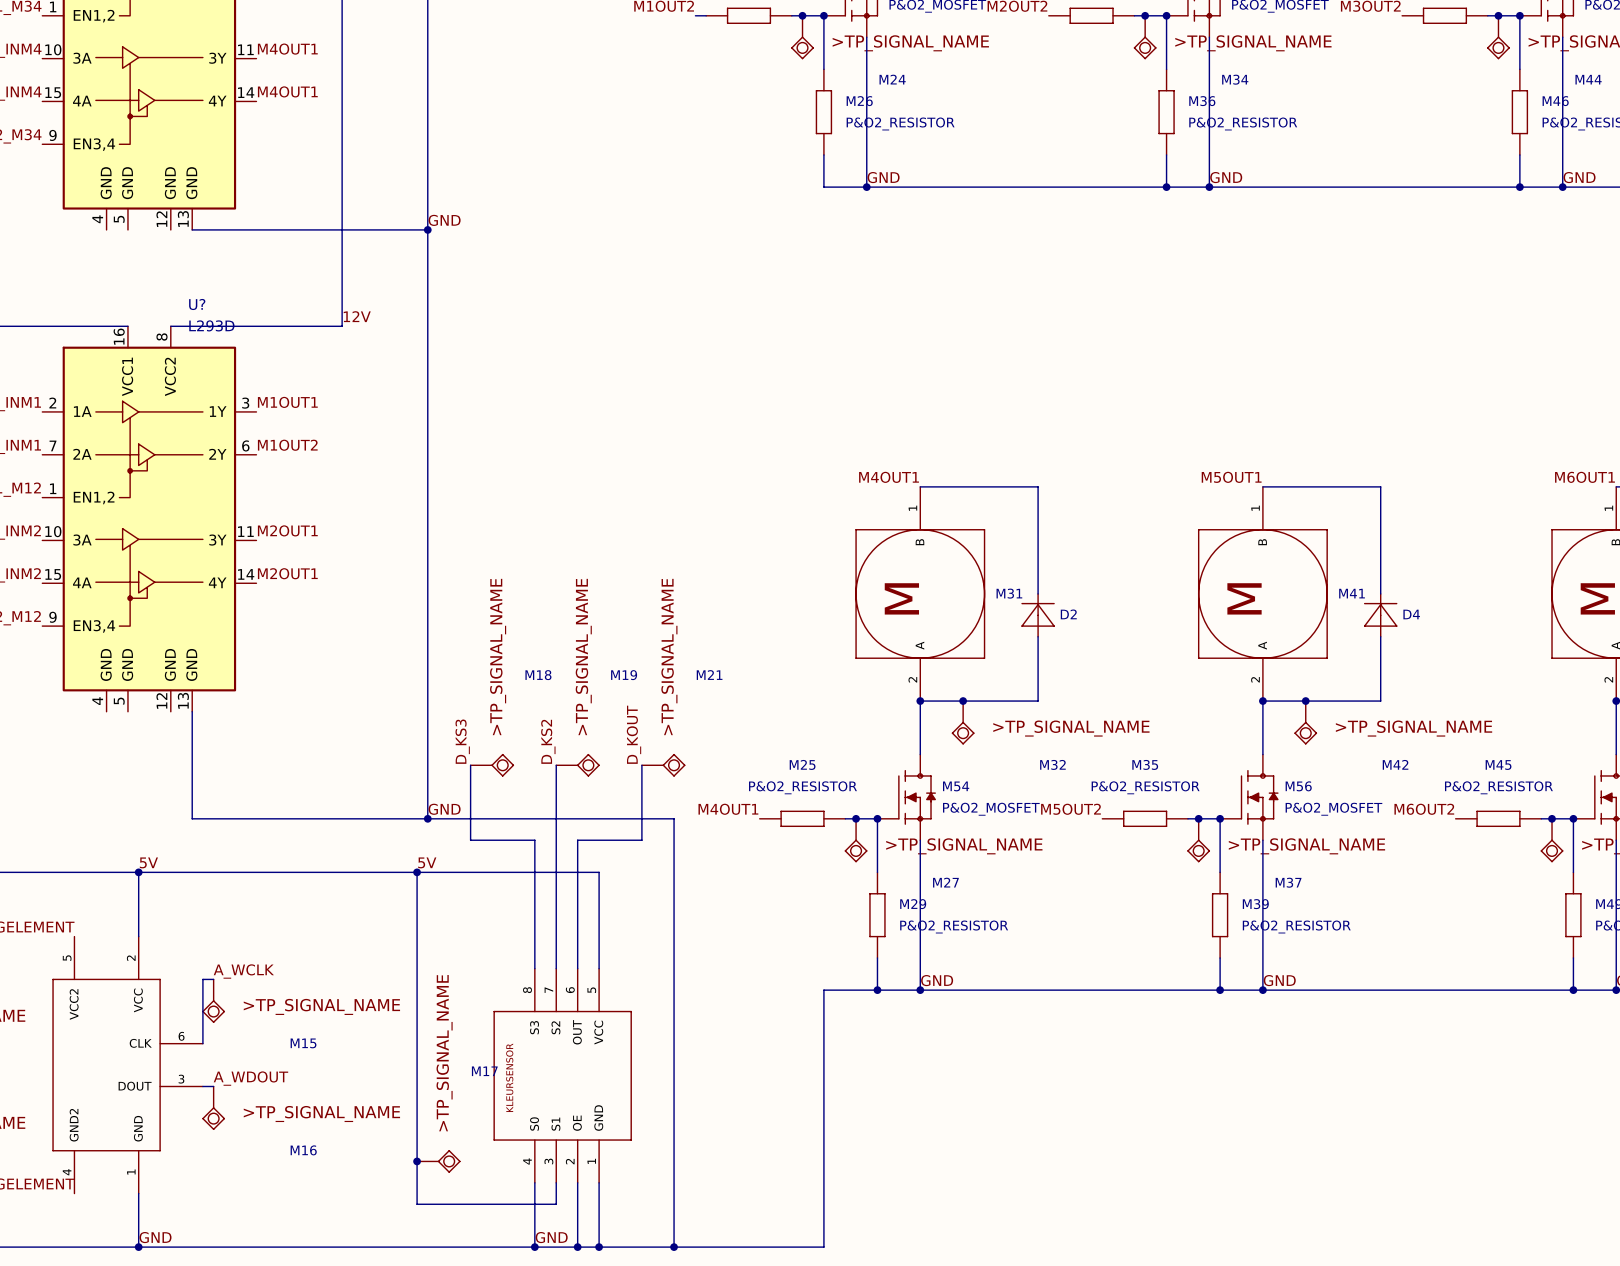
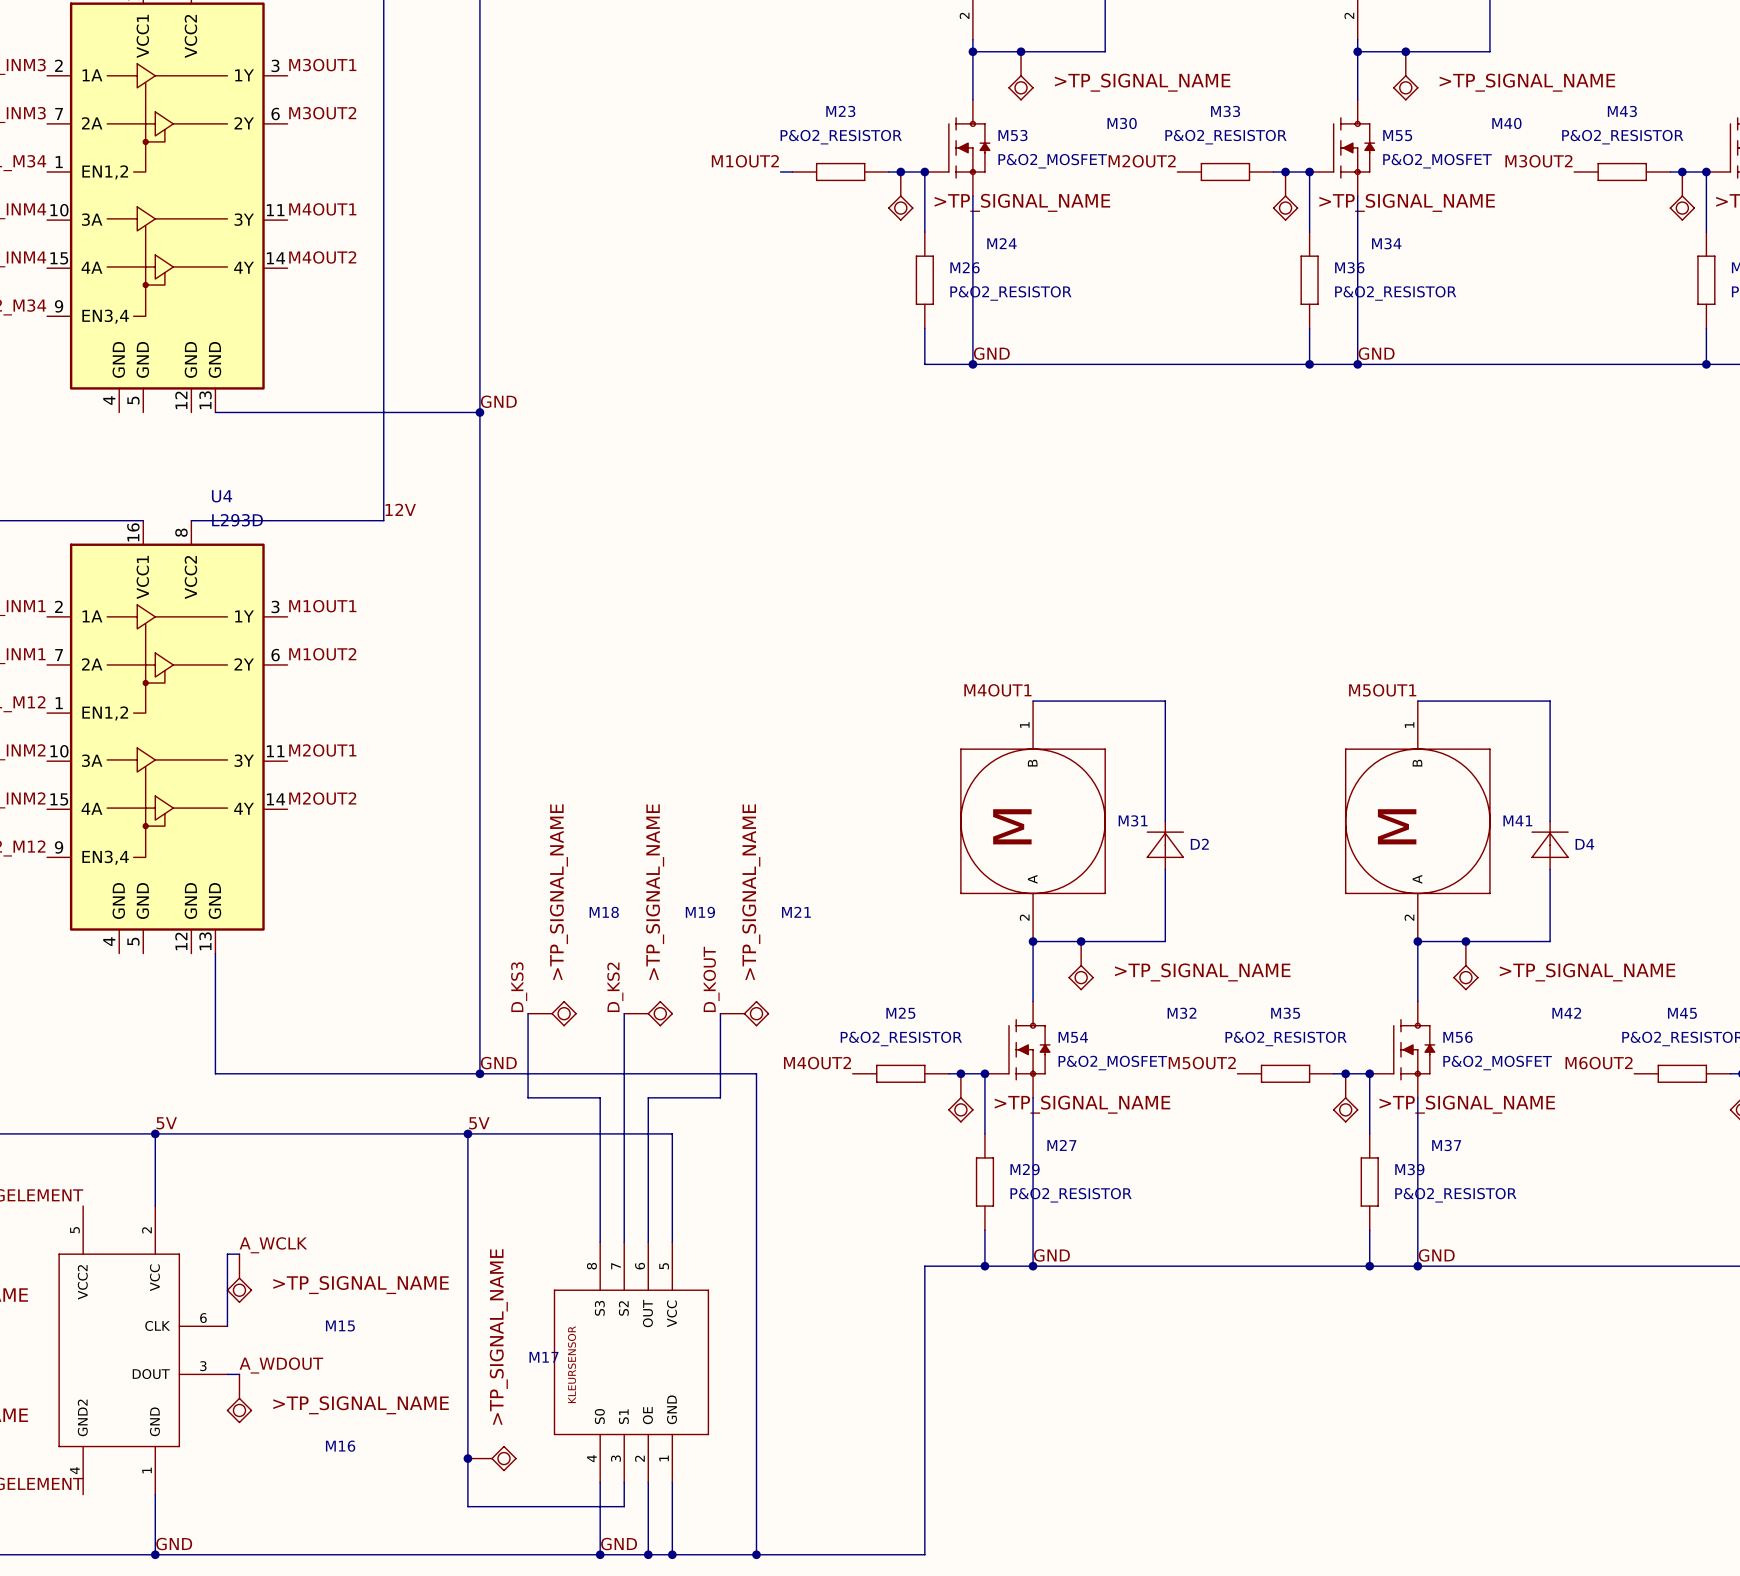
label: M4OUT1 (287, 91) -> M4OUT2 (322, 257)
U? name: U? (197, 304) -> U4 (222, 496)
label: M2OUT1 (287, 573) -> M2OUT2 (322, 798)
label: M4OUT1 (728, 809) -> M4OUT2 (817, 1063)

